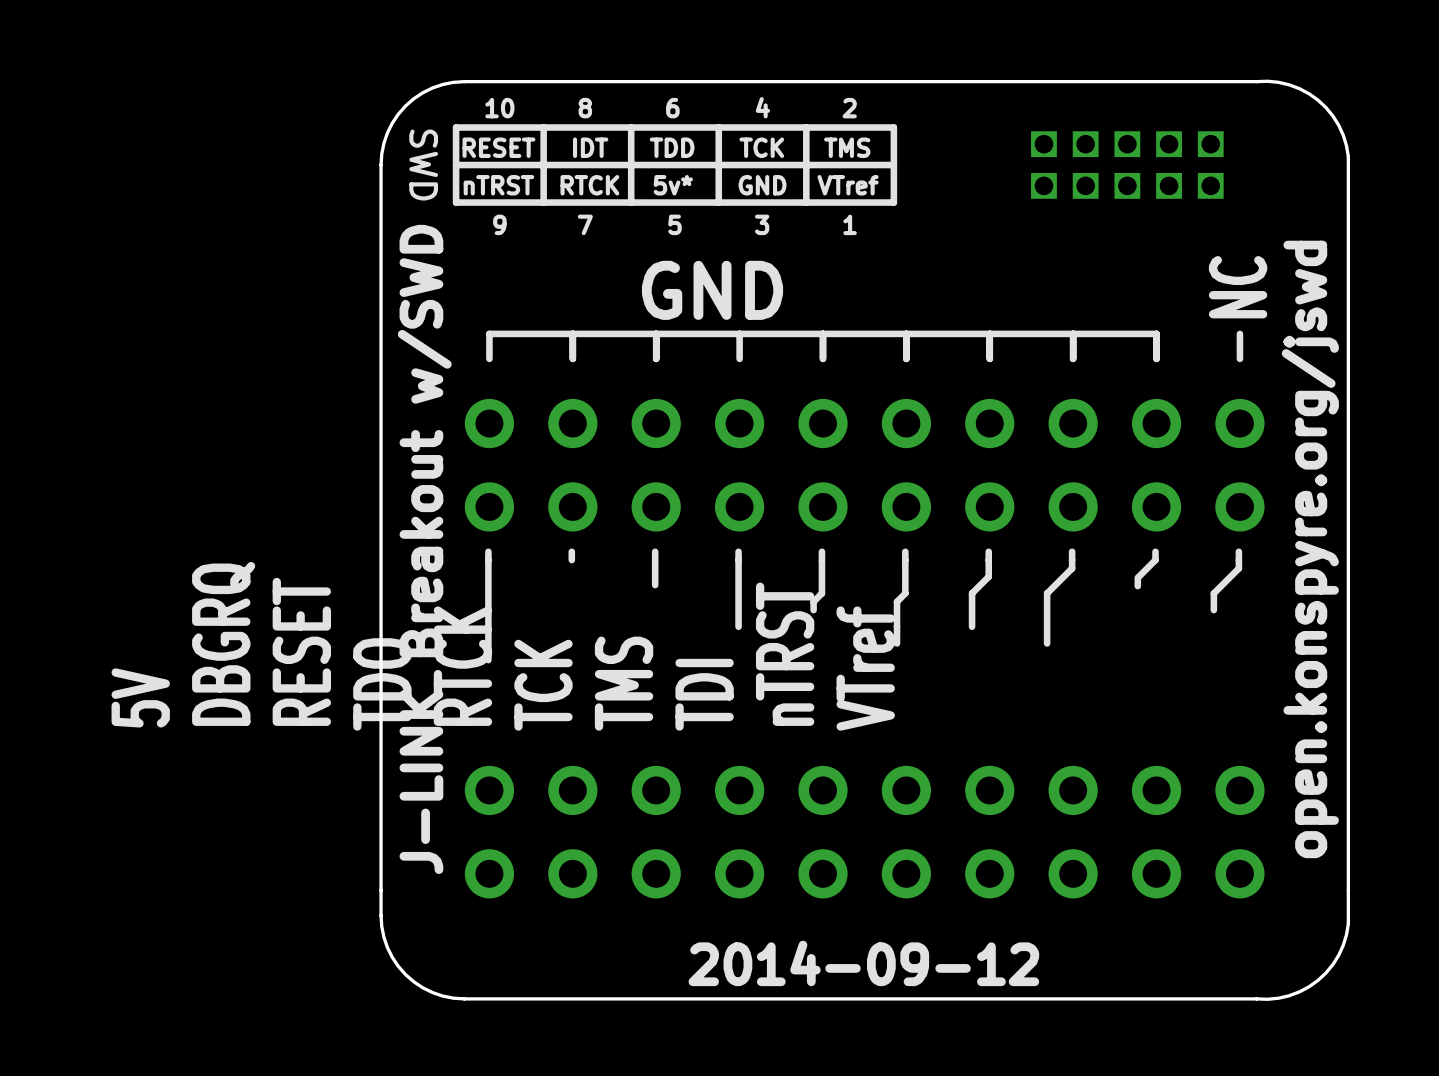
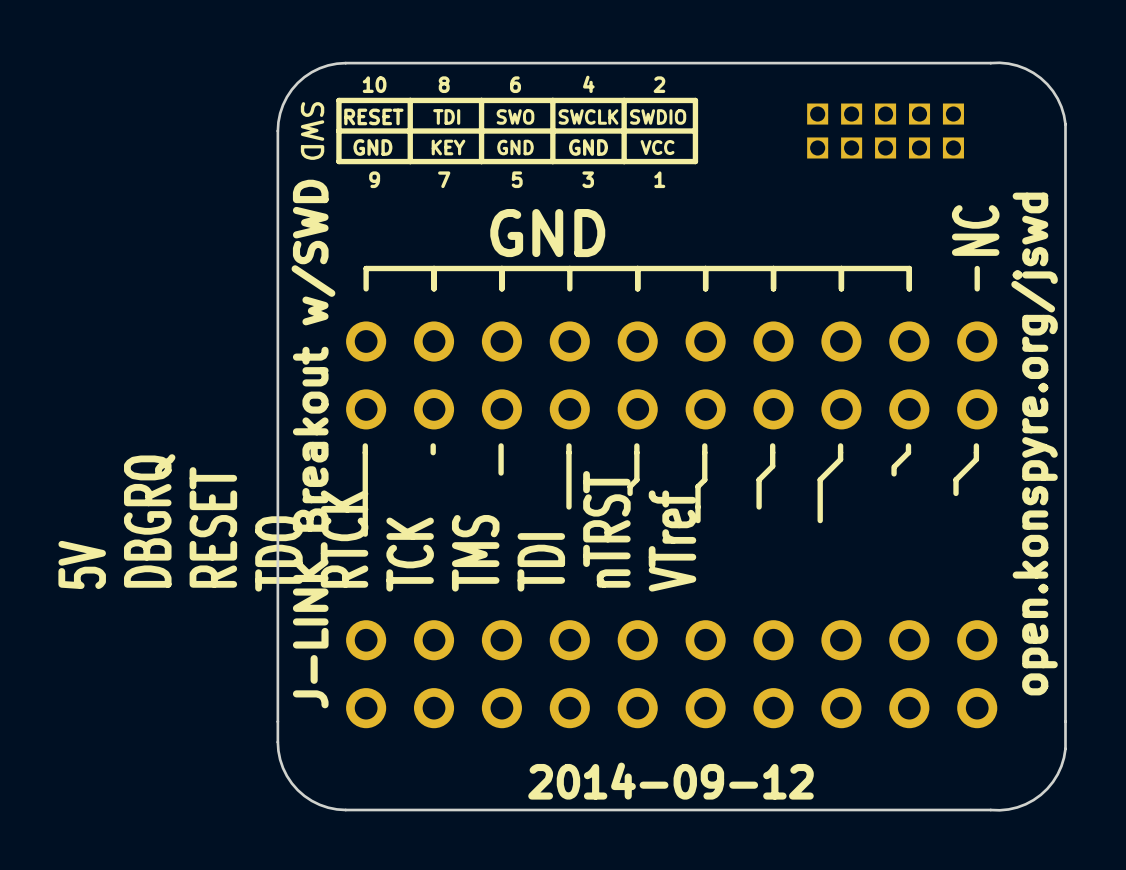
text: IDT (590, 147) -> TDI (446, 116)
text: TDD (672, 147) -> SWO (515, 116)
text: TCK (761, 147) -> SWCLK (588, 116)
text: TMS (847, 147) -> SWDIO (658, 116)
text: nTRST (498, 185) -> GND (372, 147)
text: RTCK (589, 185) -> KEY (448, 147)
text: 5v* (673, 185) -> GND (515, 147)
text: VTref (848, 185) -> VCC (657, 147)

